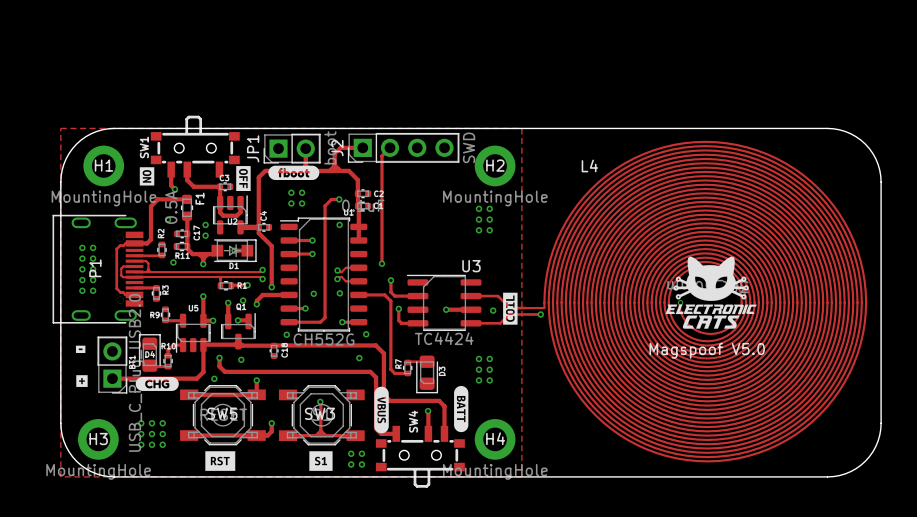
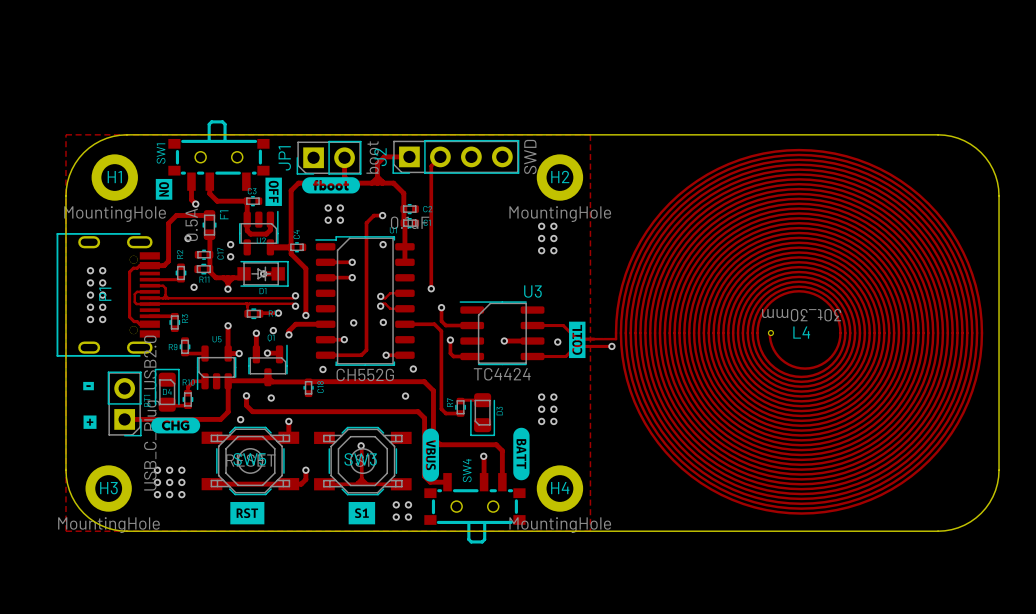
L4 name position: L4 (589, 165) -> L4 (801, 332)
drawing: [665, 256, 757, 329] -> none
text: Magspoof V5.0 (707, 350) -> none

